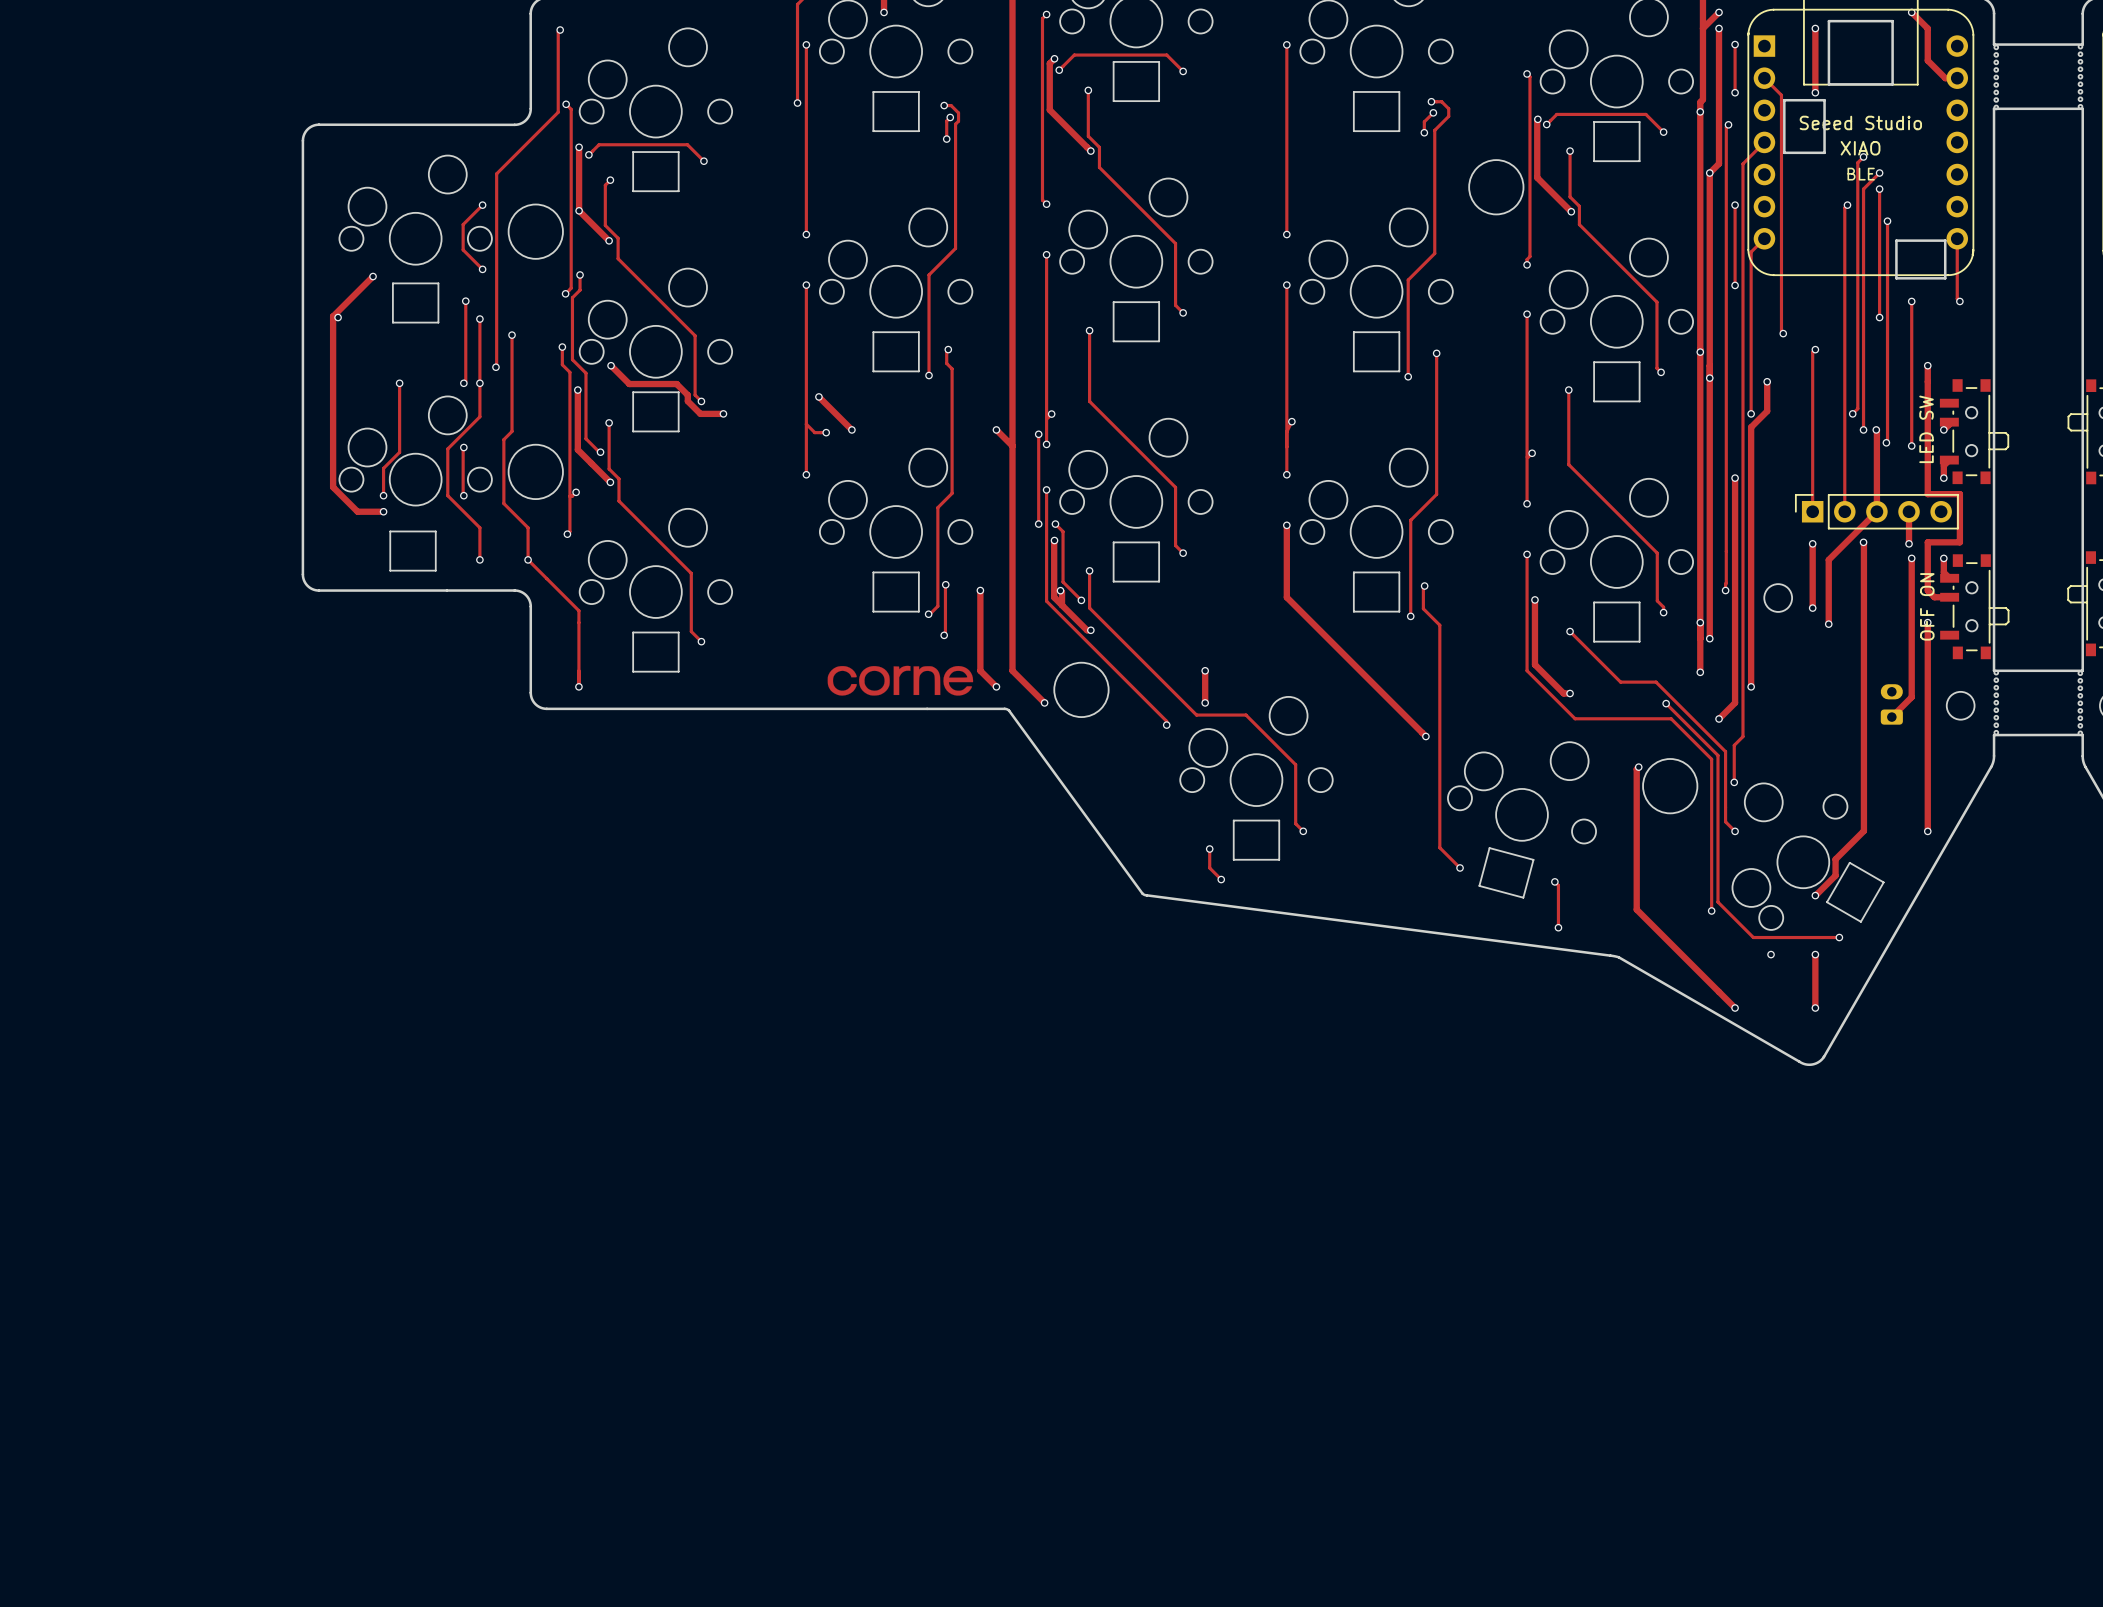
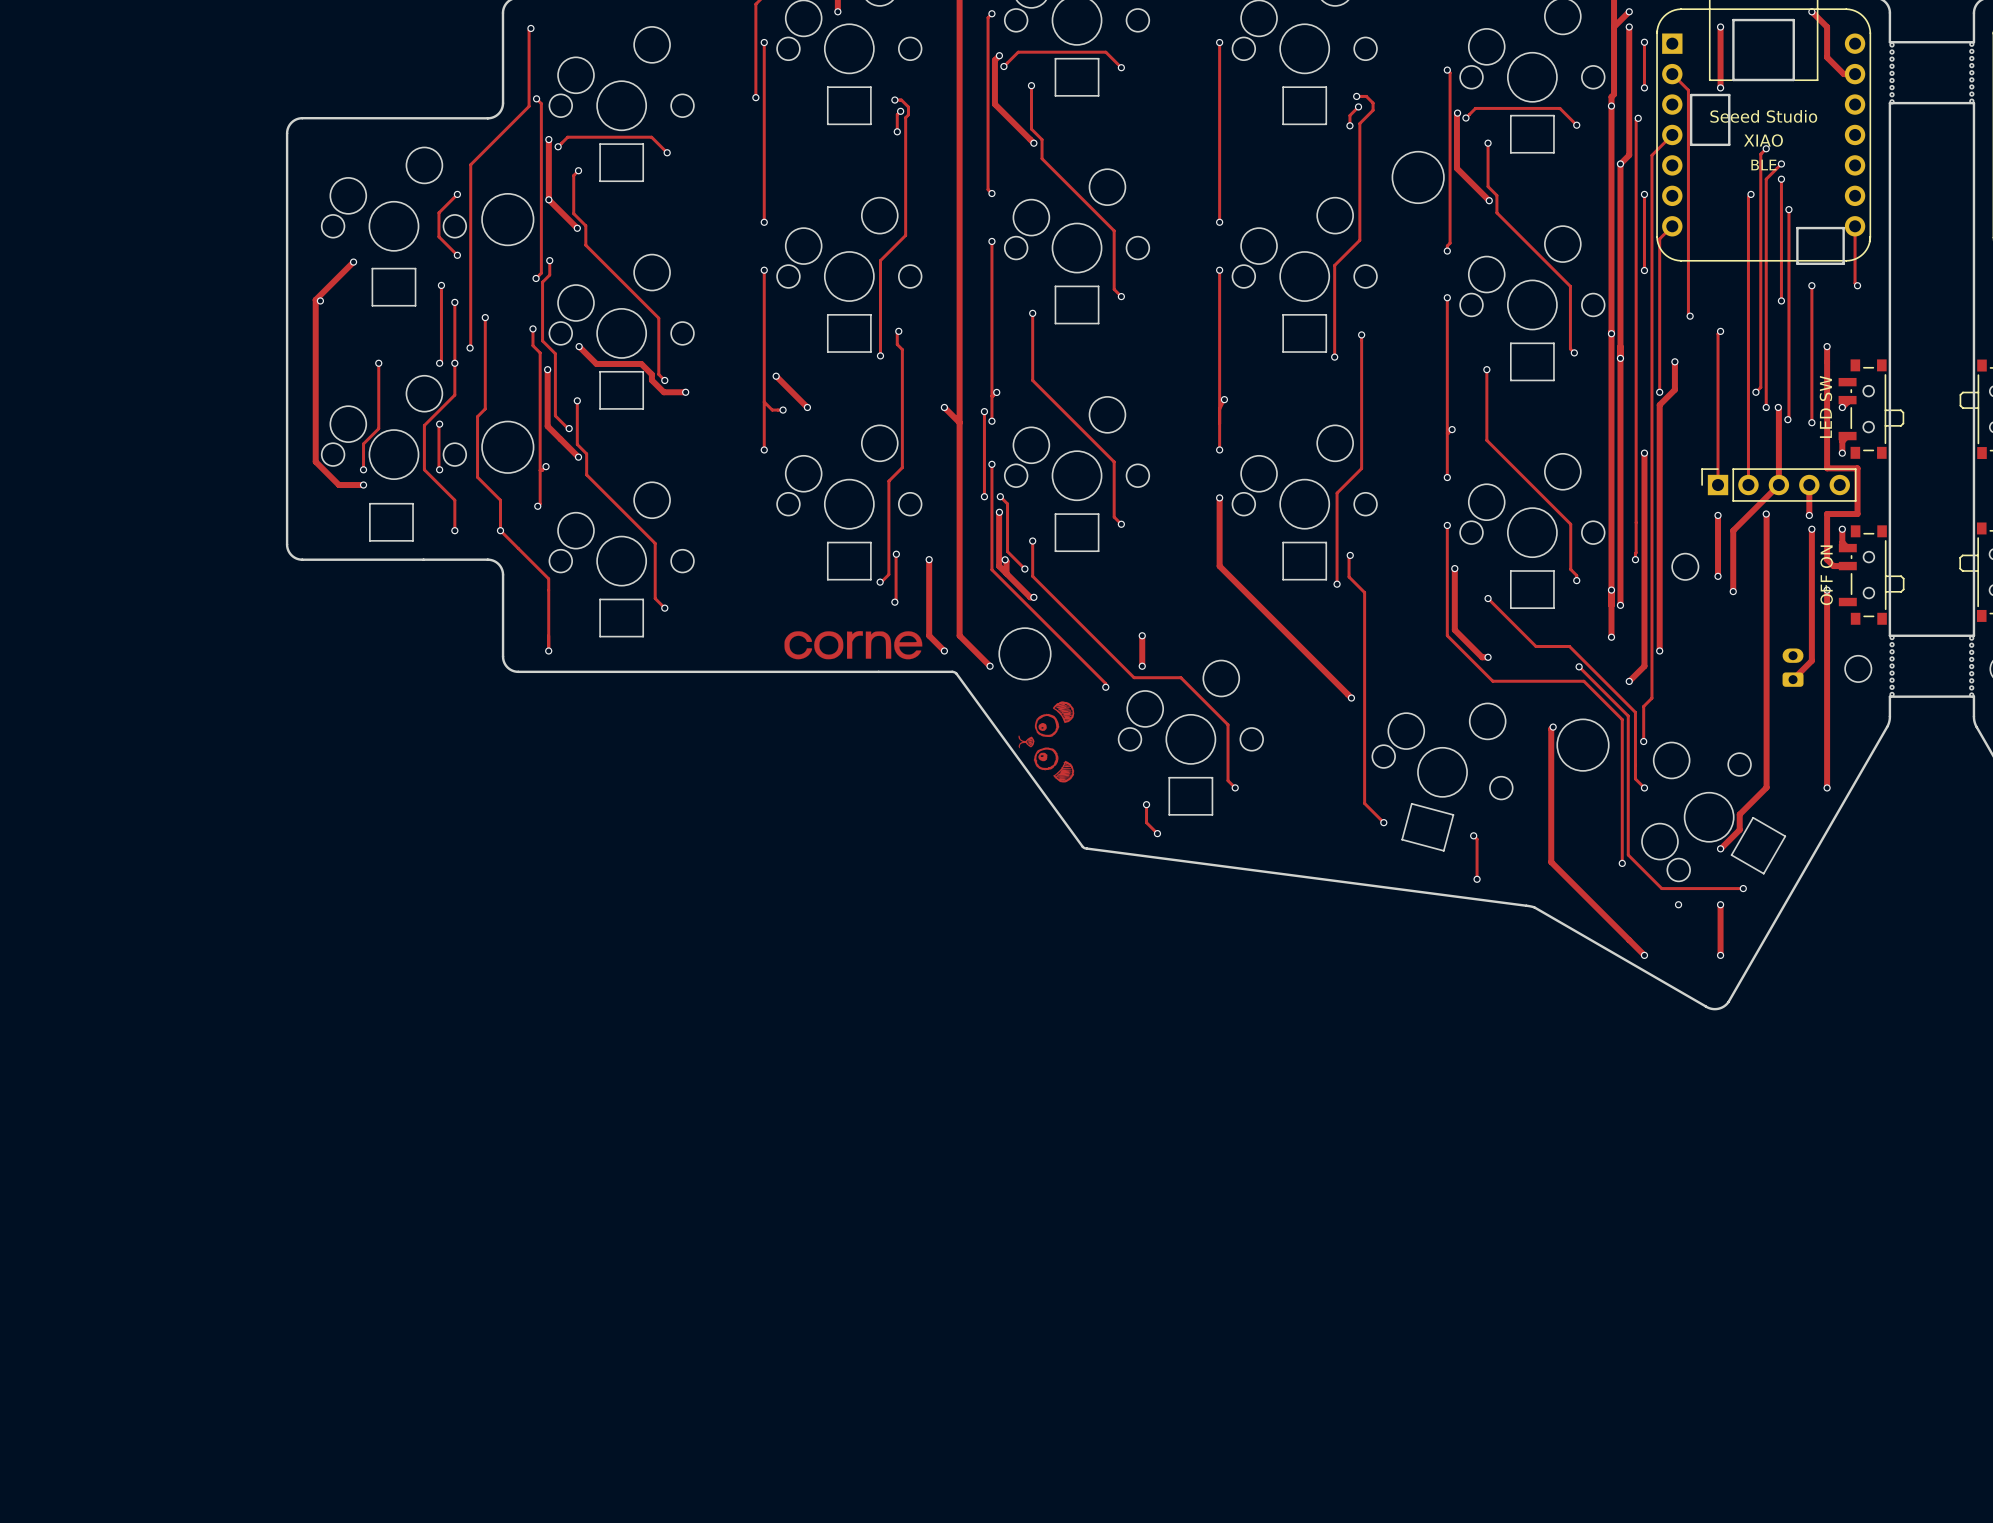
drawing: none -> [1018, 701, 1075, 783]

